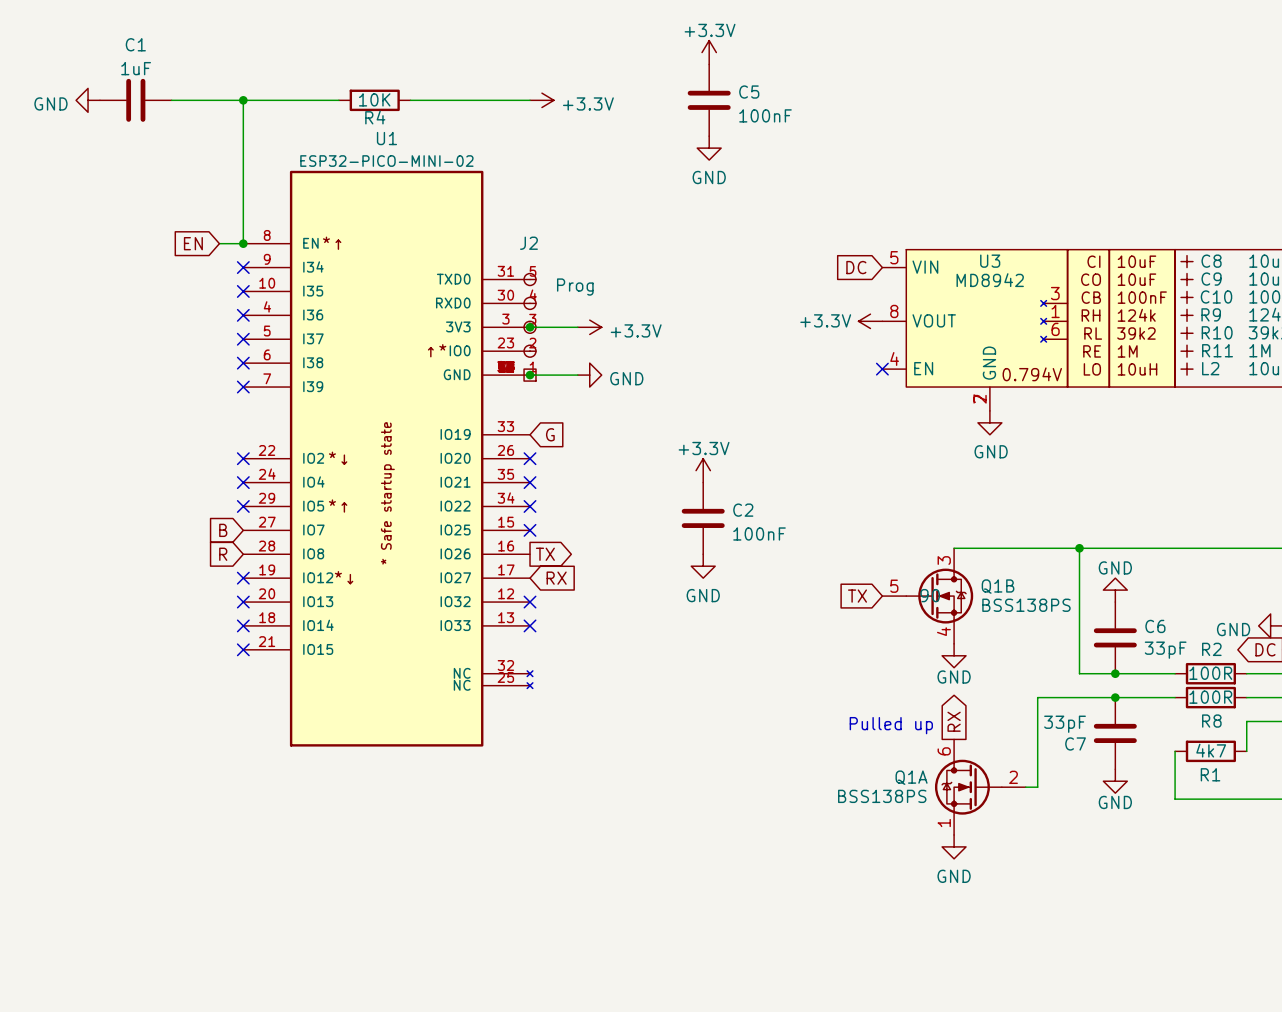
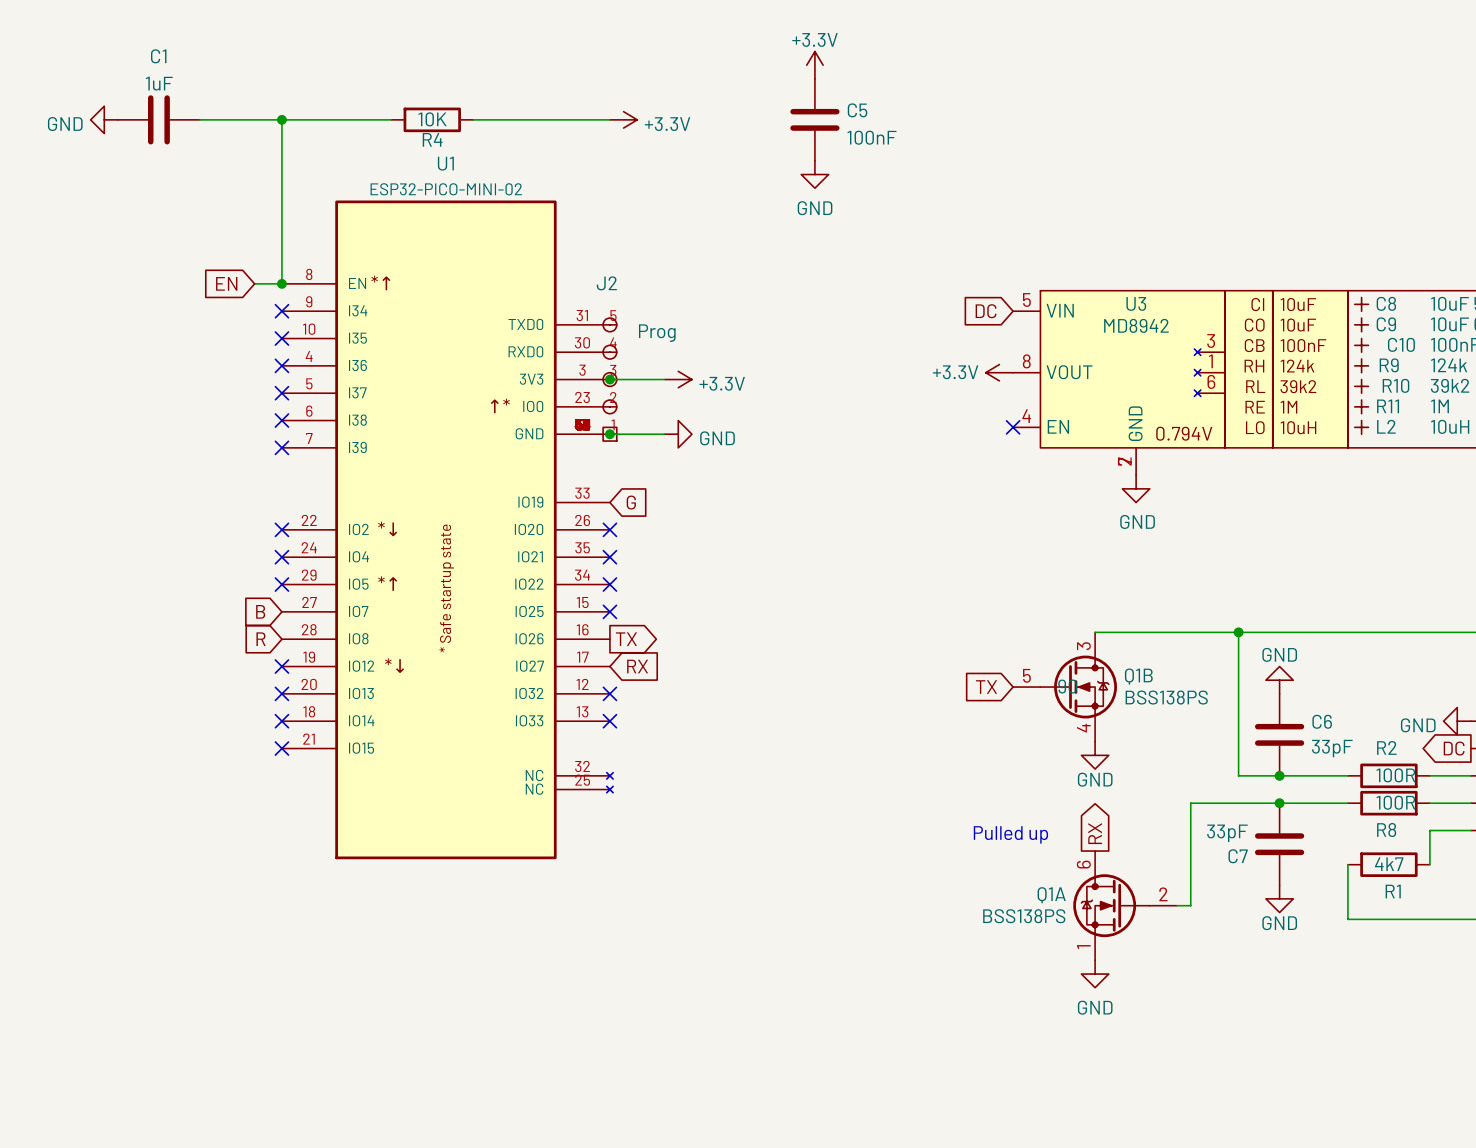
power symbol: +3.3V (703, 470) -> none
C2: 100nF (703, 518) -> none
power symbol: GND (703, 566) -> none

